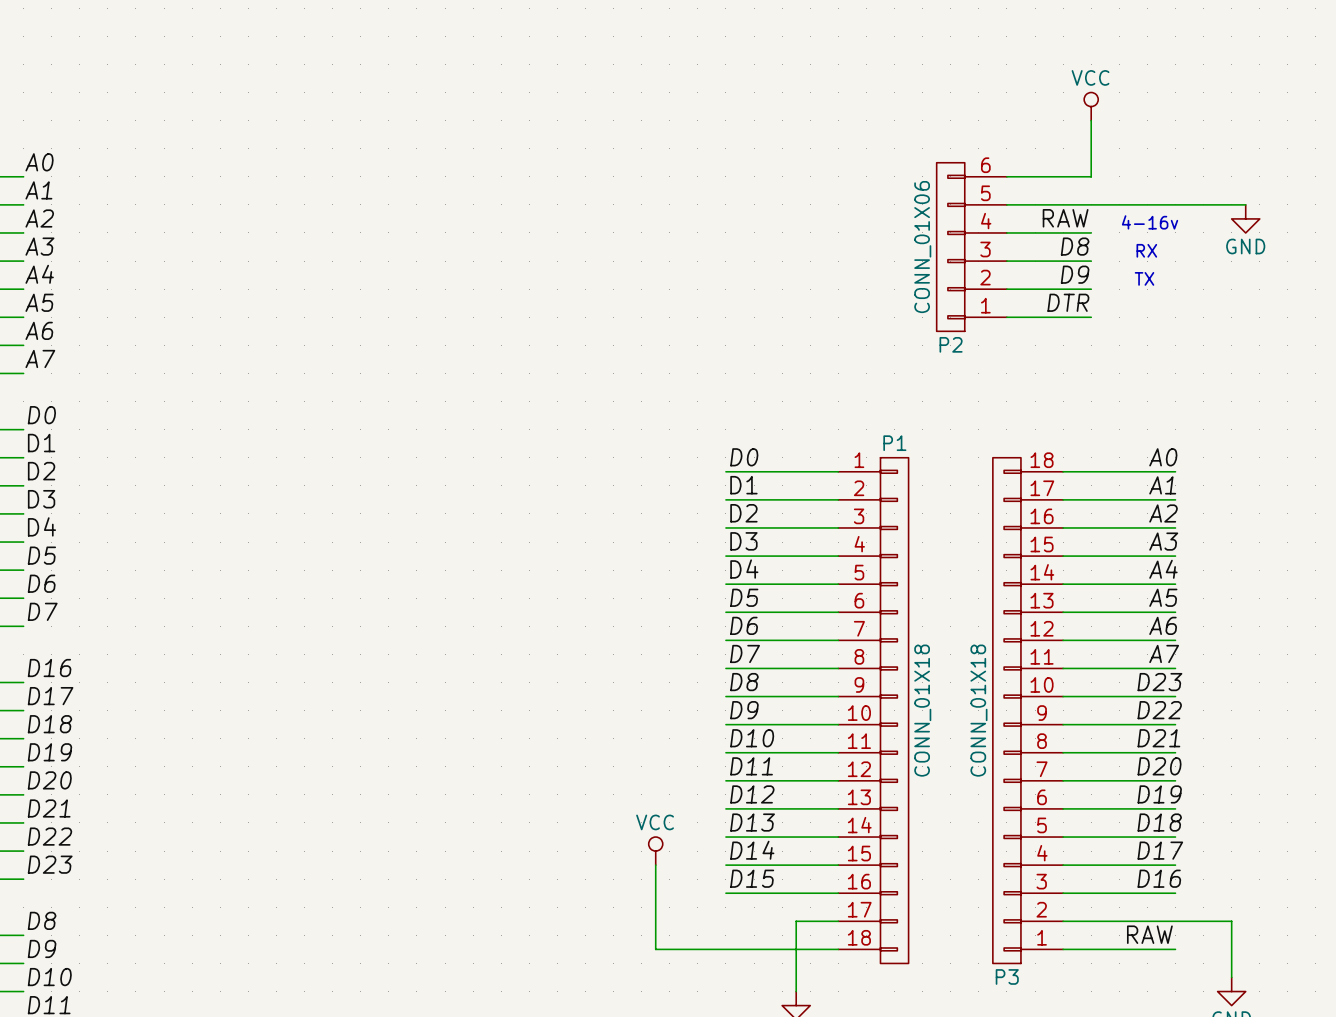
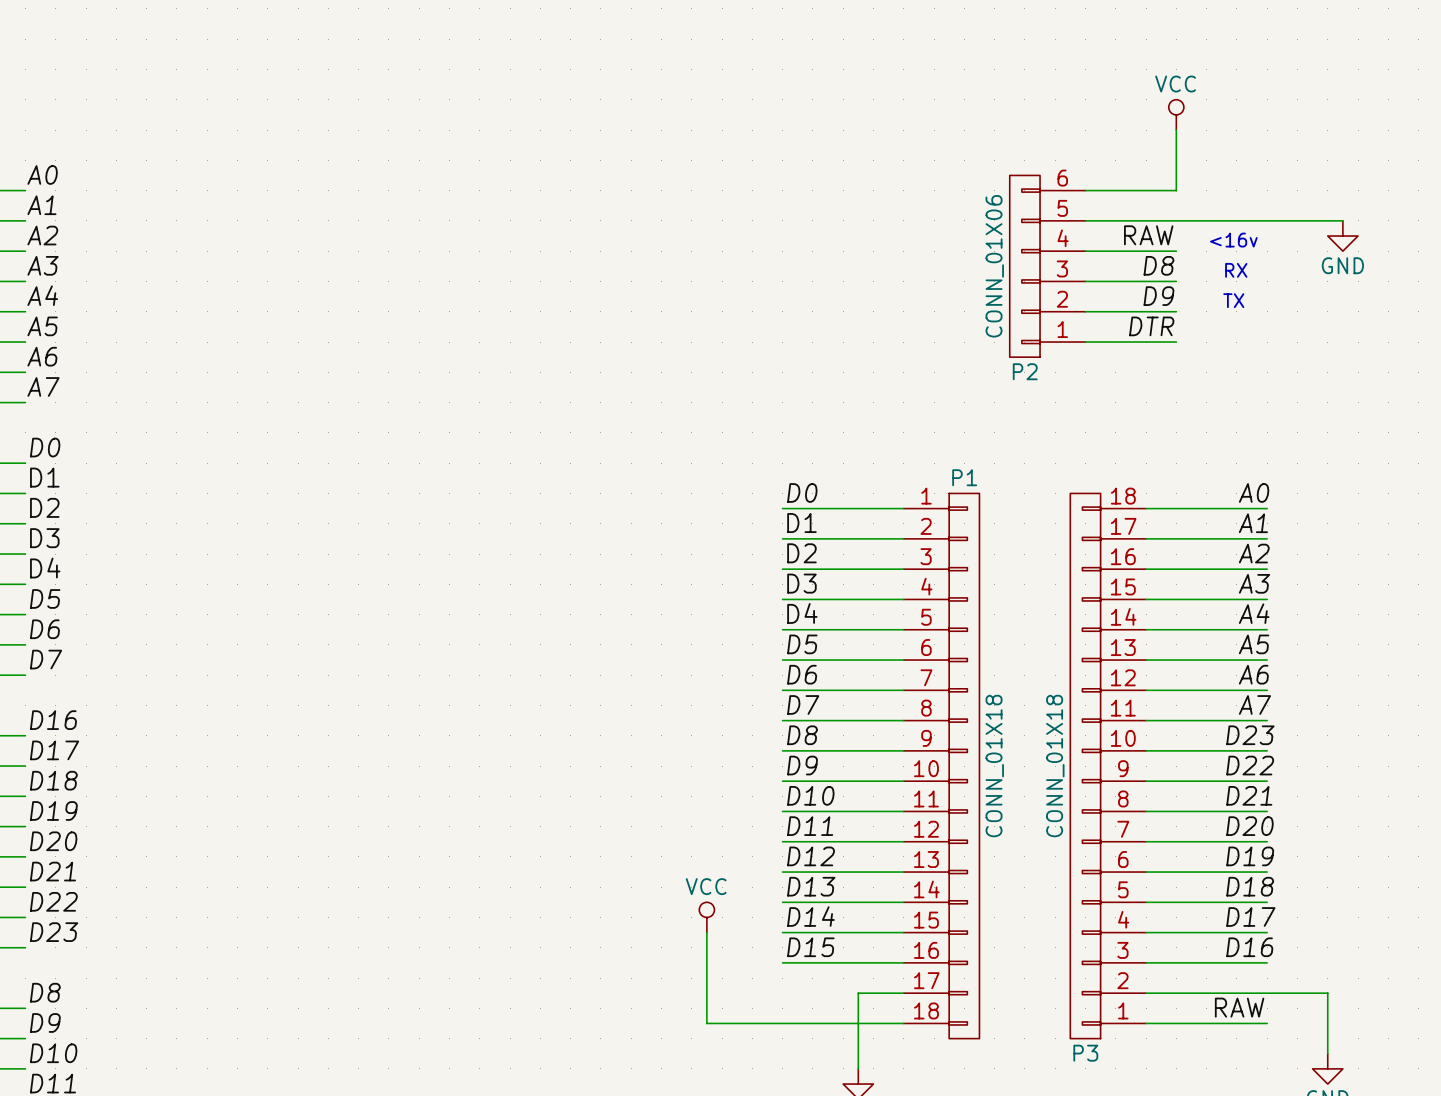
text: 4-16v (1150, 222) -> <16v (1233, 240)

